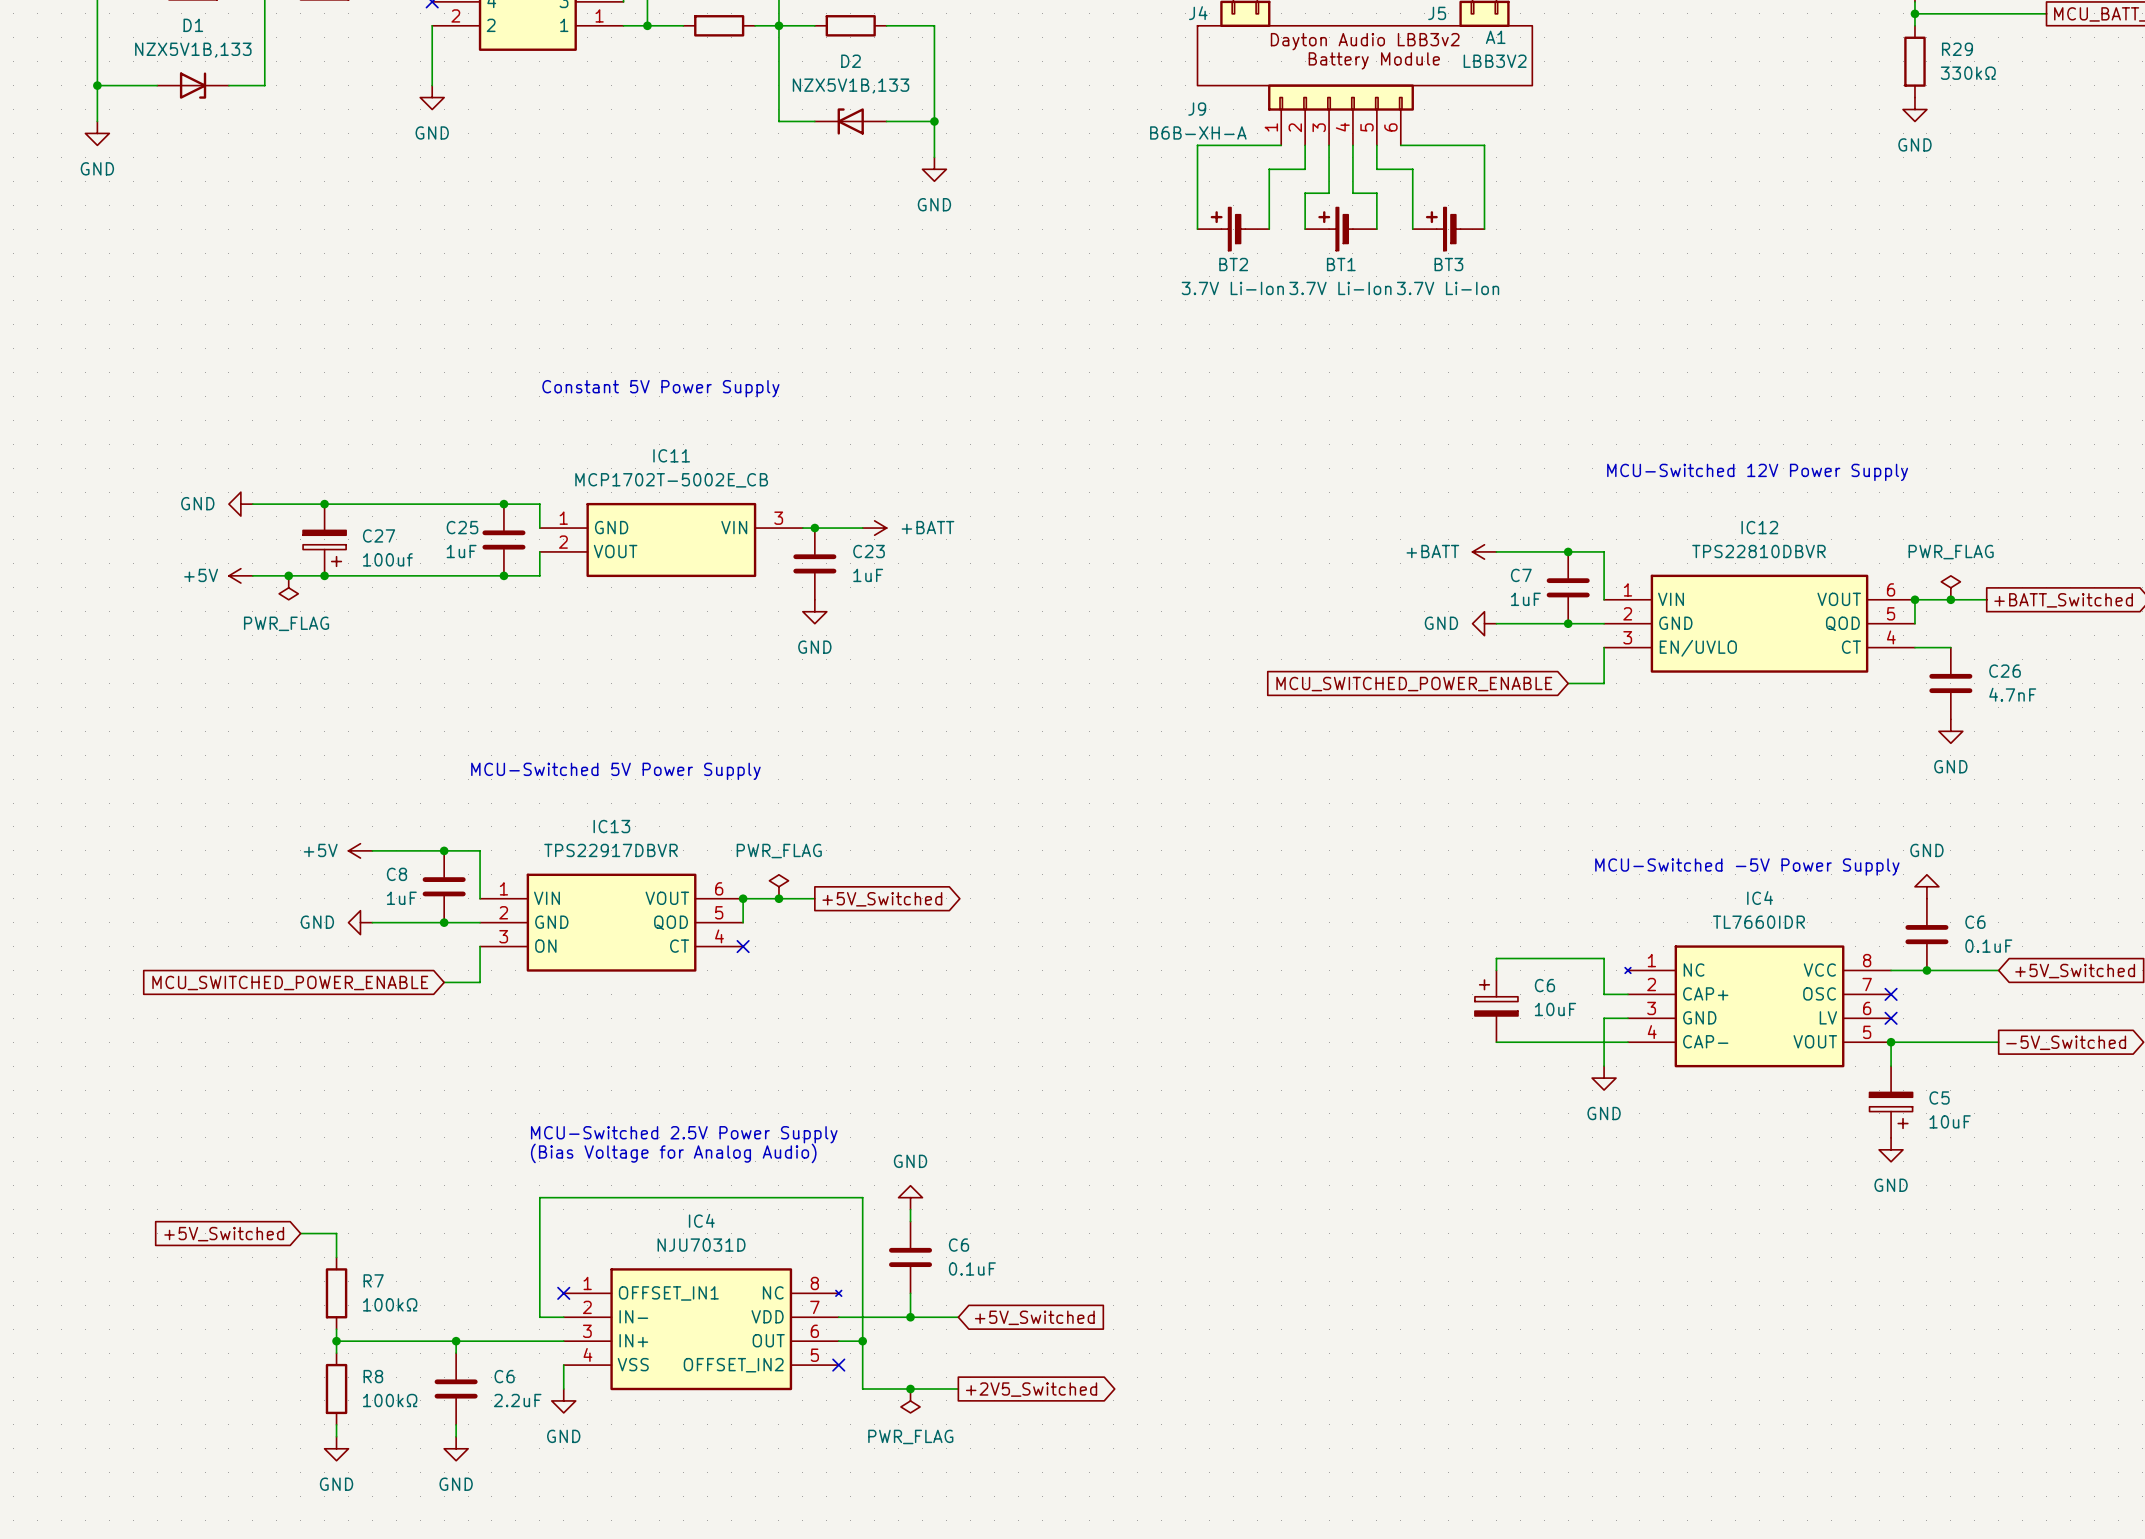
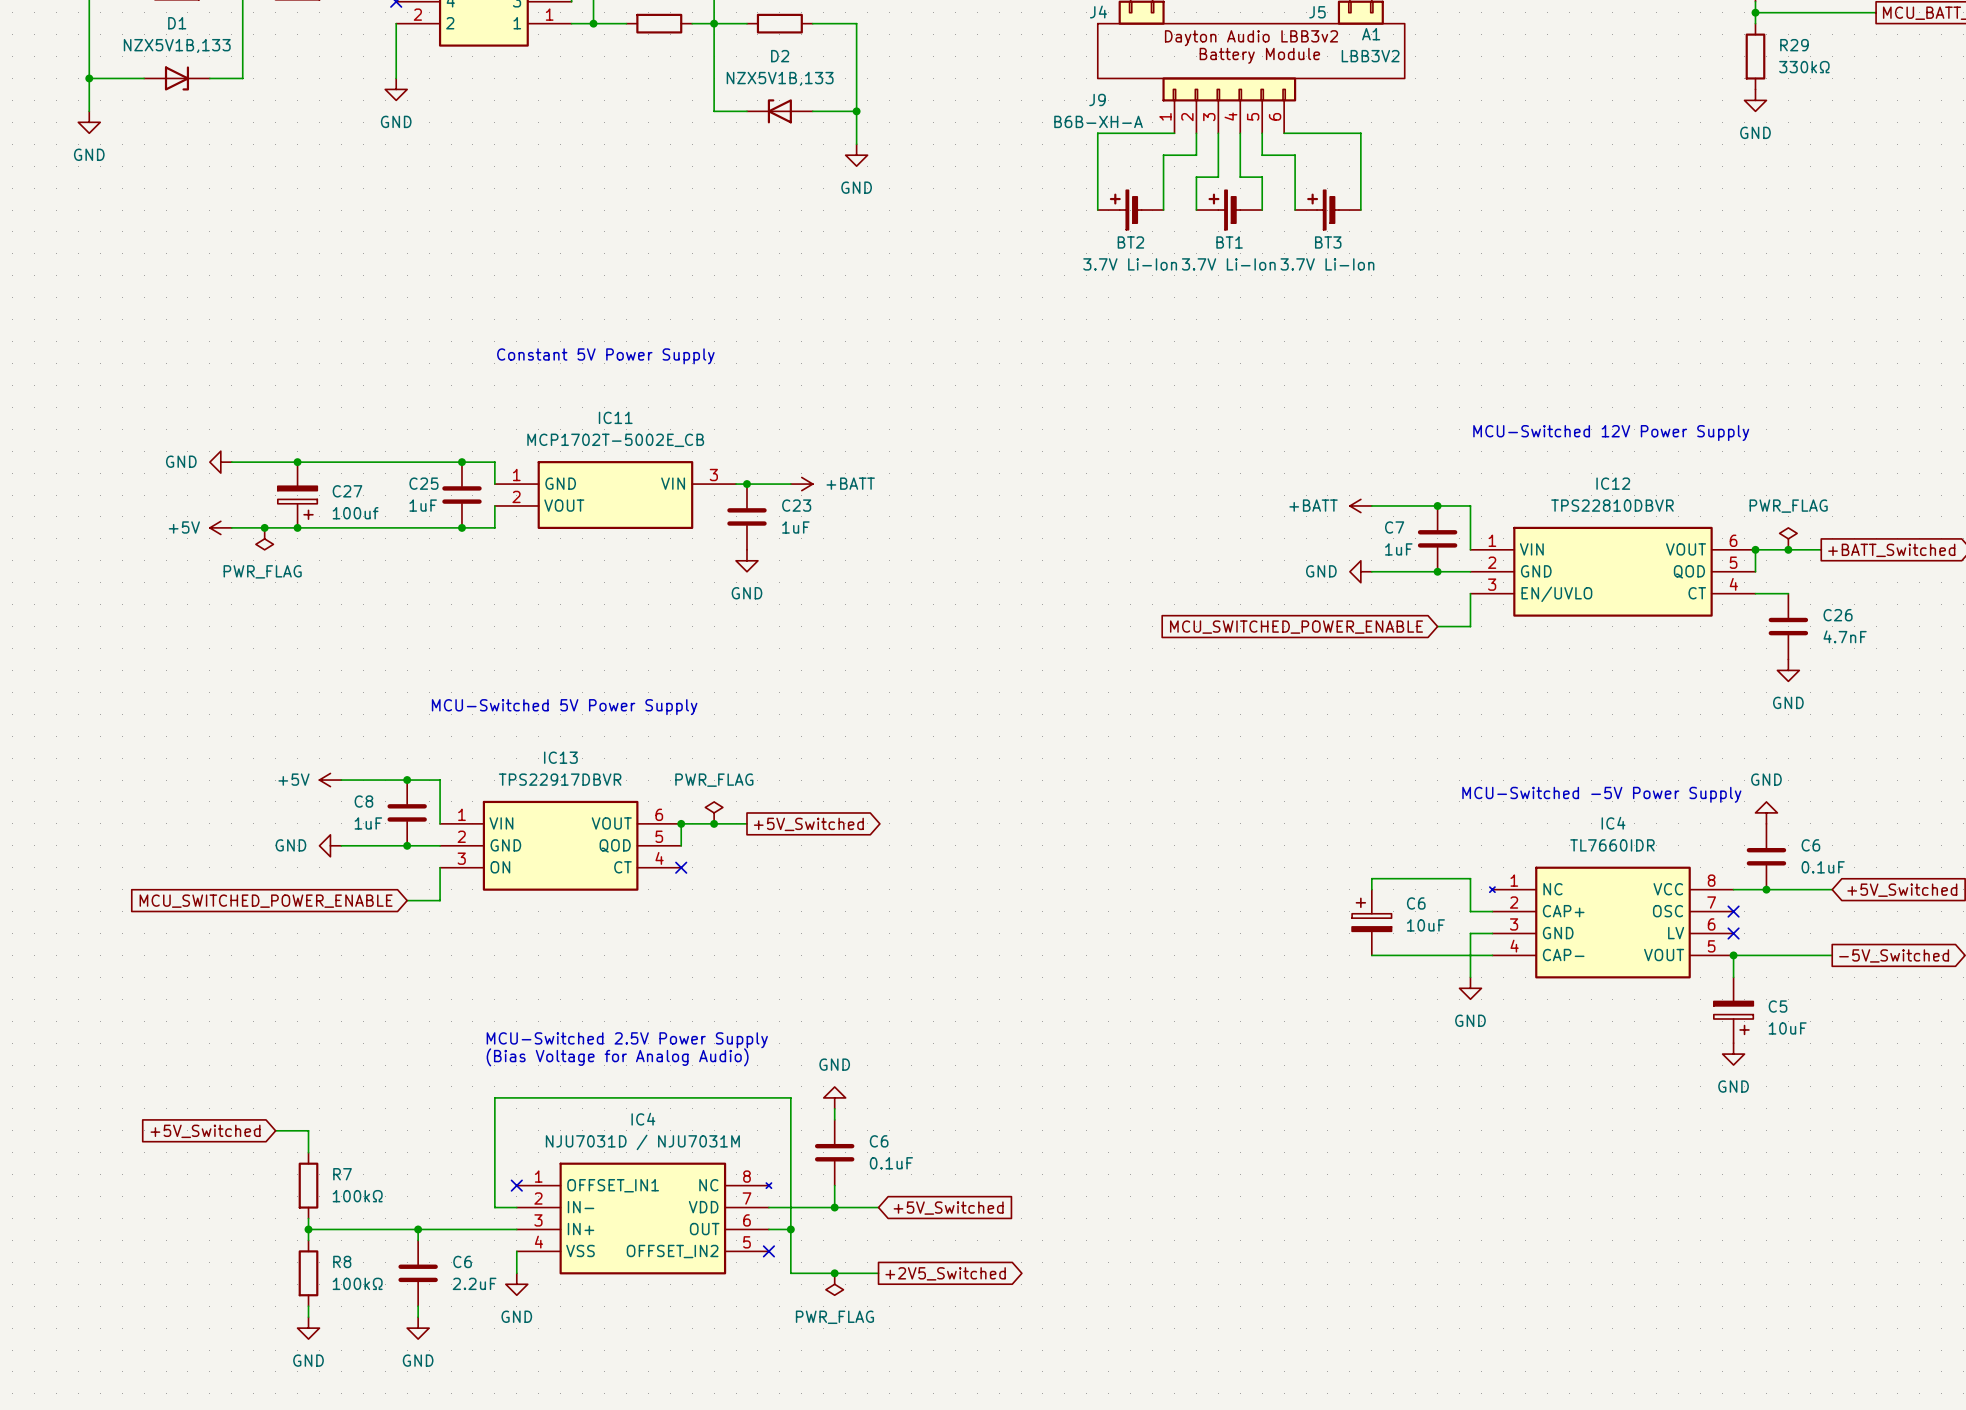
IC4 value: NJU7031D (701, 1245) -> NJU7031D / NJU7031M (642, 1142)

